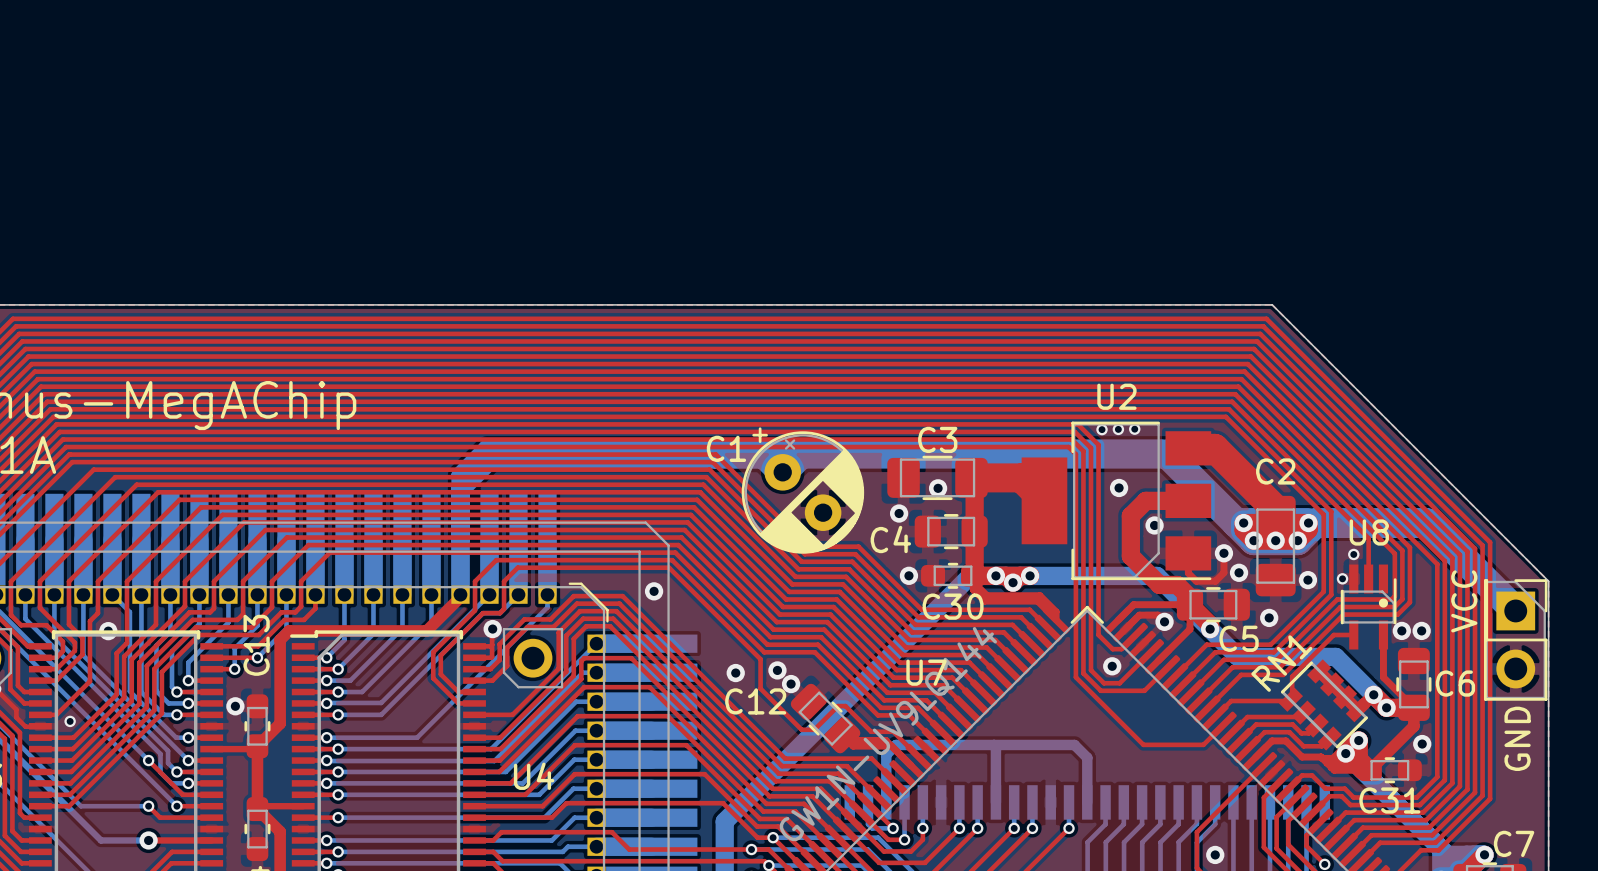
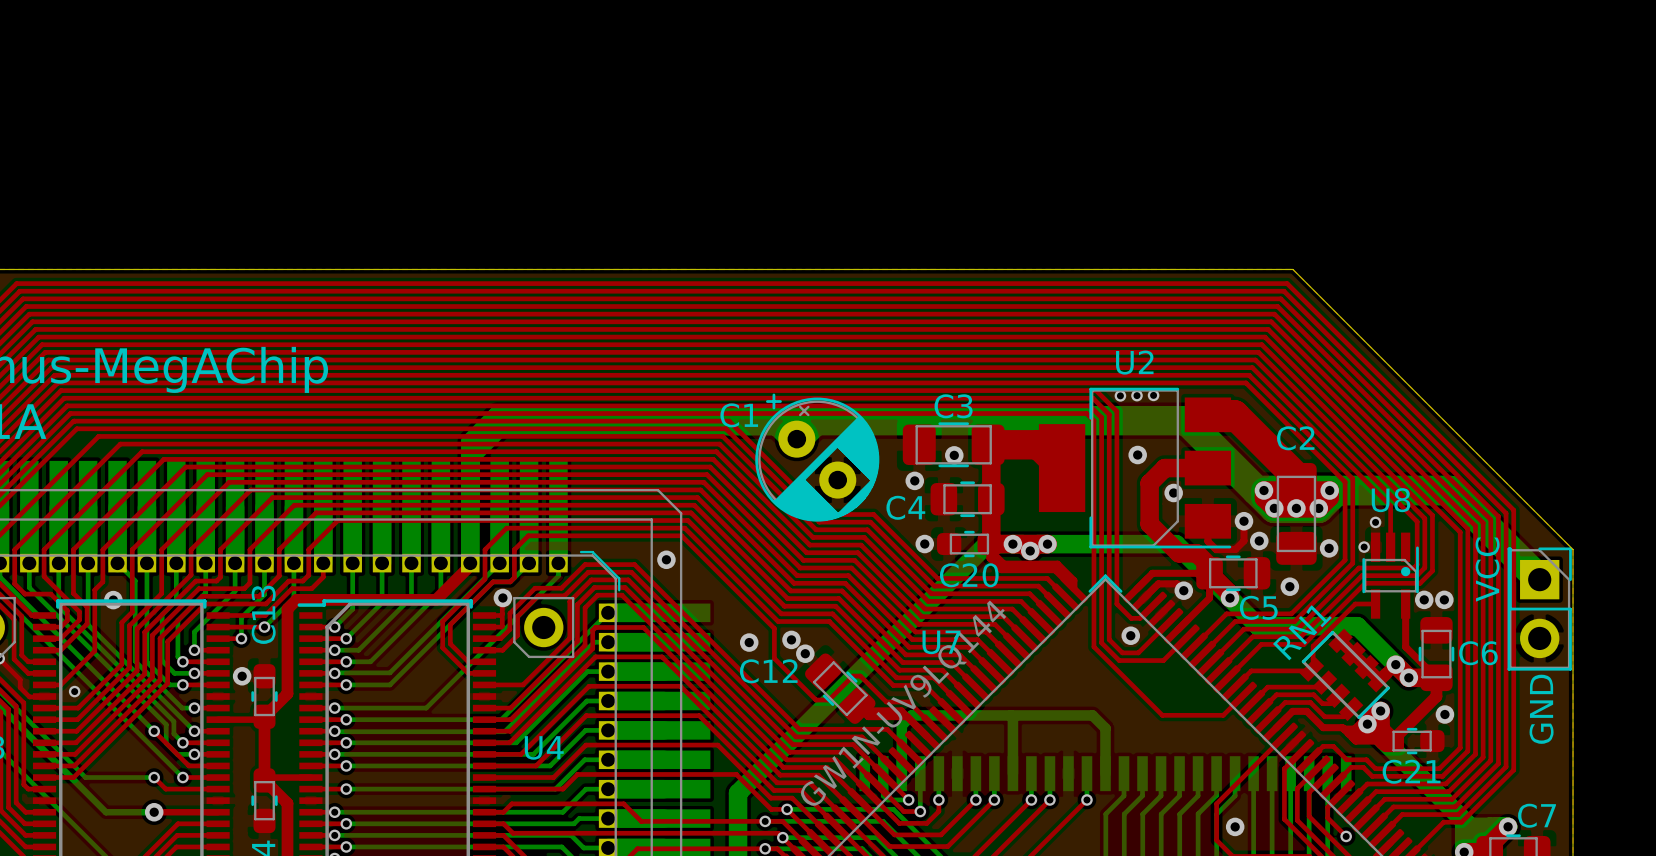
C30 name: C30 (953, 606) -> C20 (969, 575)
C31 name: C31 (1389, 800) -> C21 (1411, 771)

